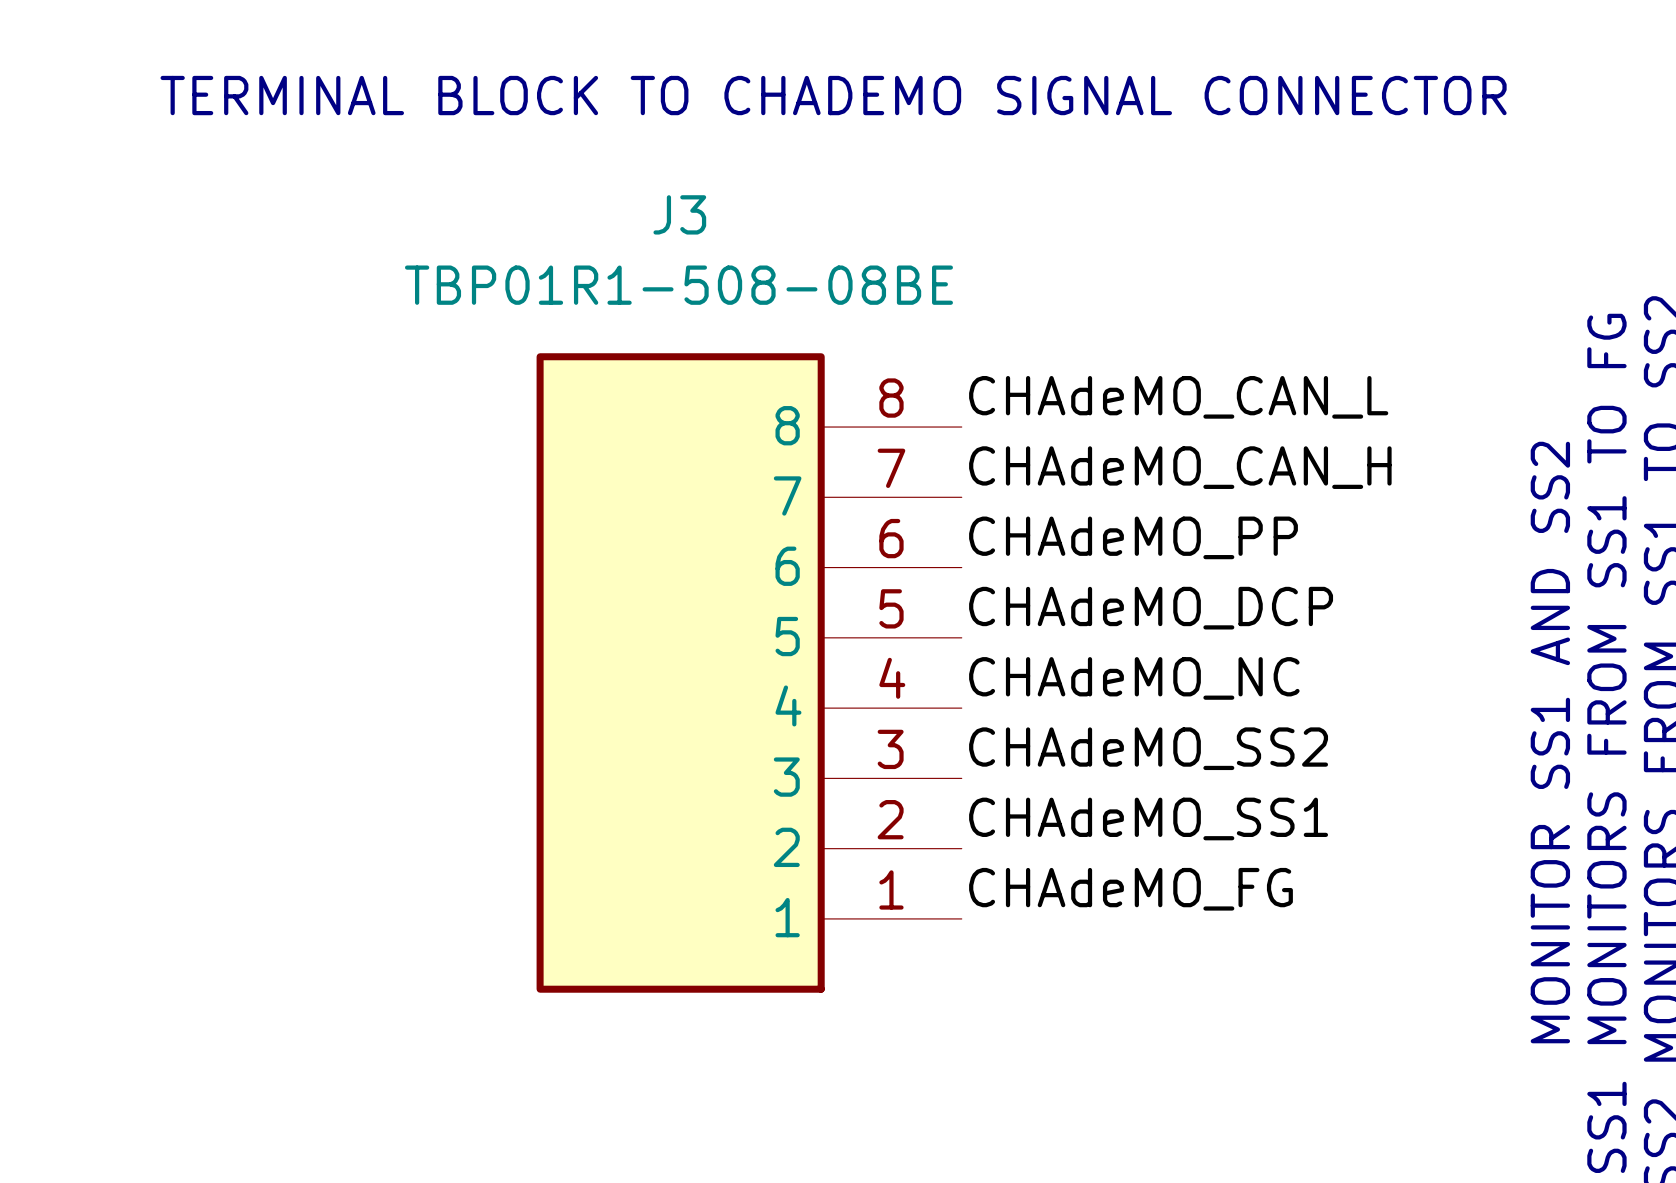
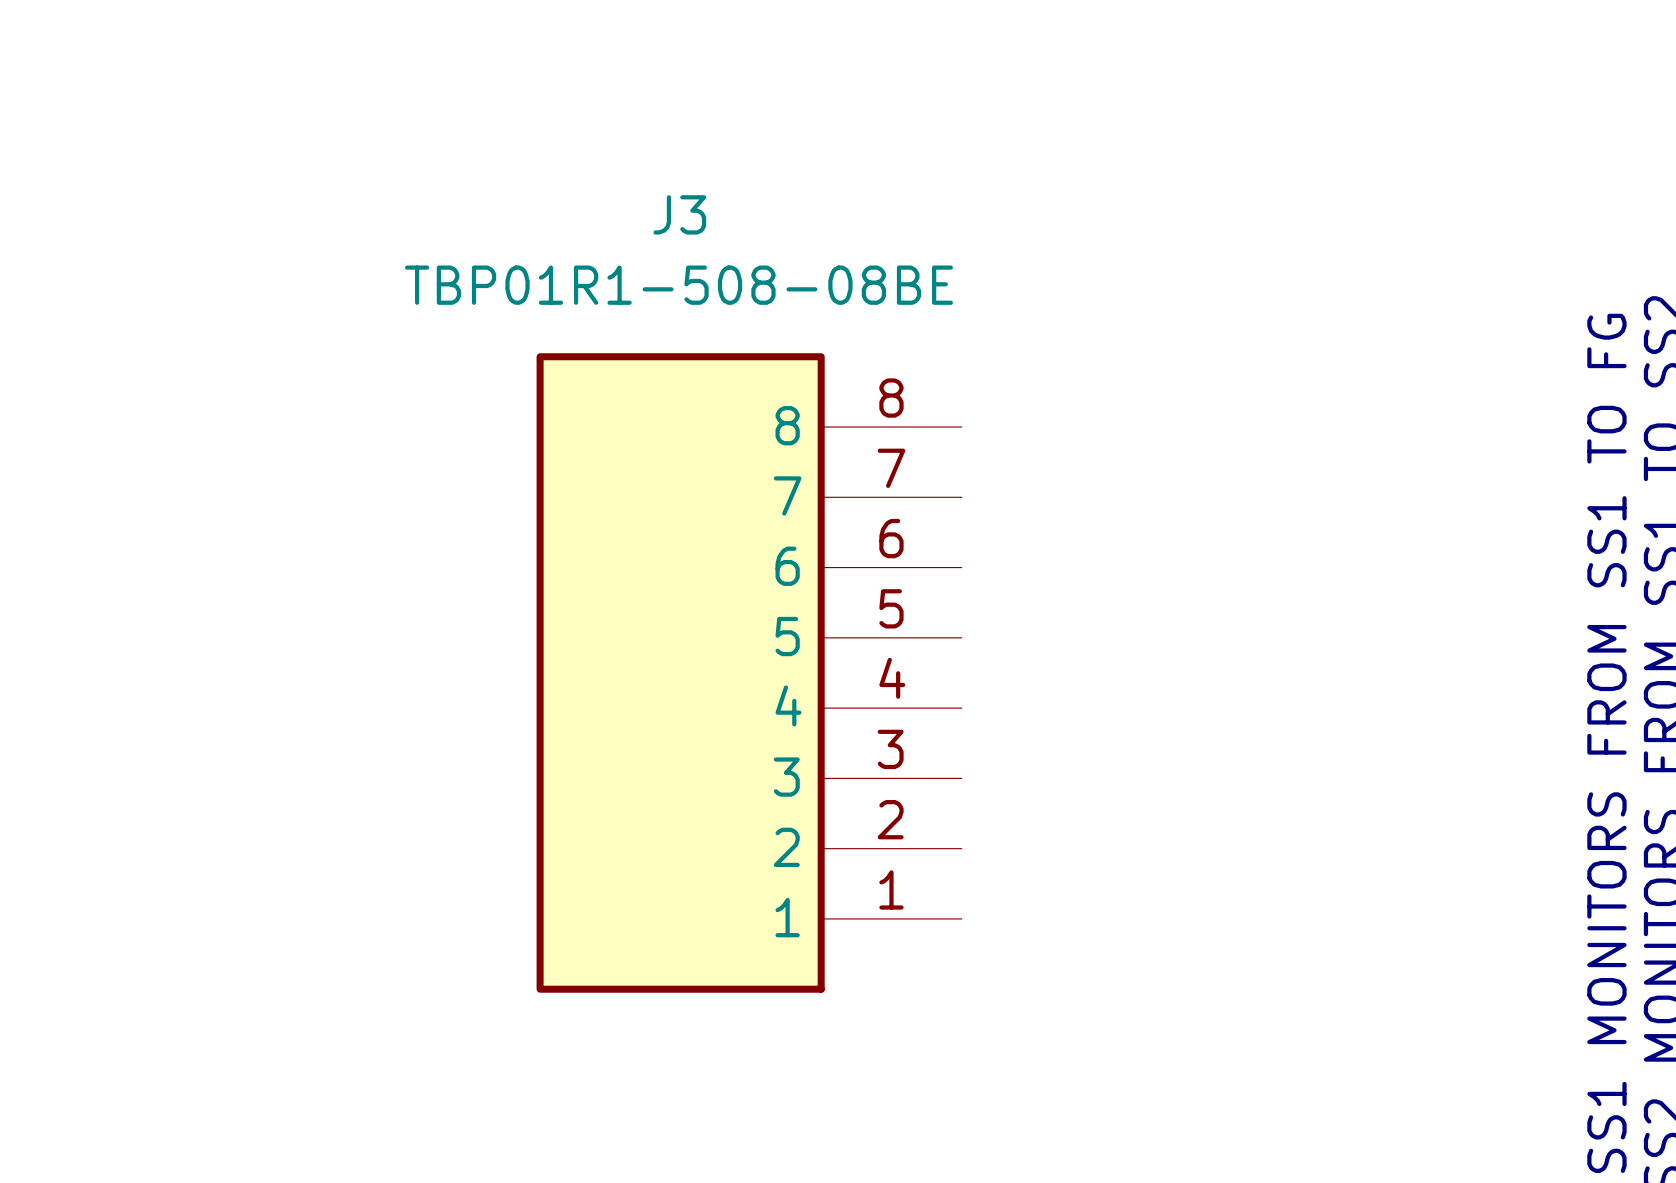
text: TERMINAL BLOCK TO CHADEMO SIGNAL CONNECTOR (833, 95) -> none
label: CHAdeMO_CAN_L (1178, 397) -> none
label: CHAdeMO_CAN_H (1180, 467) -> none
label: CHAdeMO_PP (1133, 537) -> none
label: CHAdeMO_DCP (1151, 608) -> none
label: CHAdeMO_NC (1134, 678) -> none
text: MONITOR SS1 AND SS2 (1550, 742) -> none
label: CHAdeMO_SS2 (1148, 748) -> none
label: CHAdeMO_SS1 (1148, 818) -> none
label: CHAdeMO_FG (1131, 889) -> none

